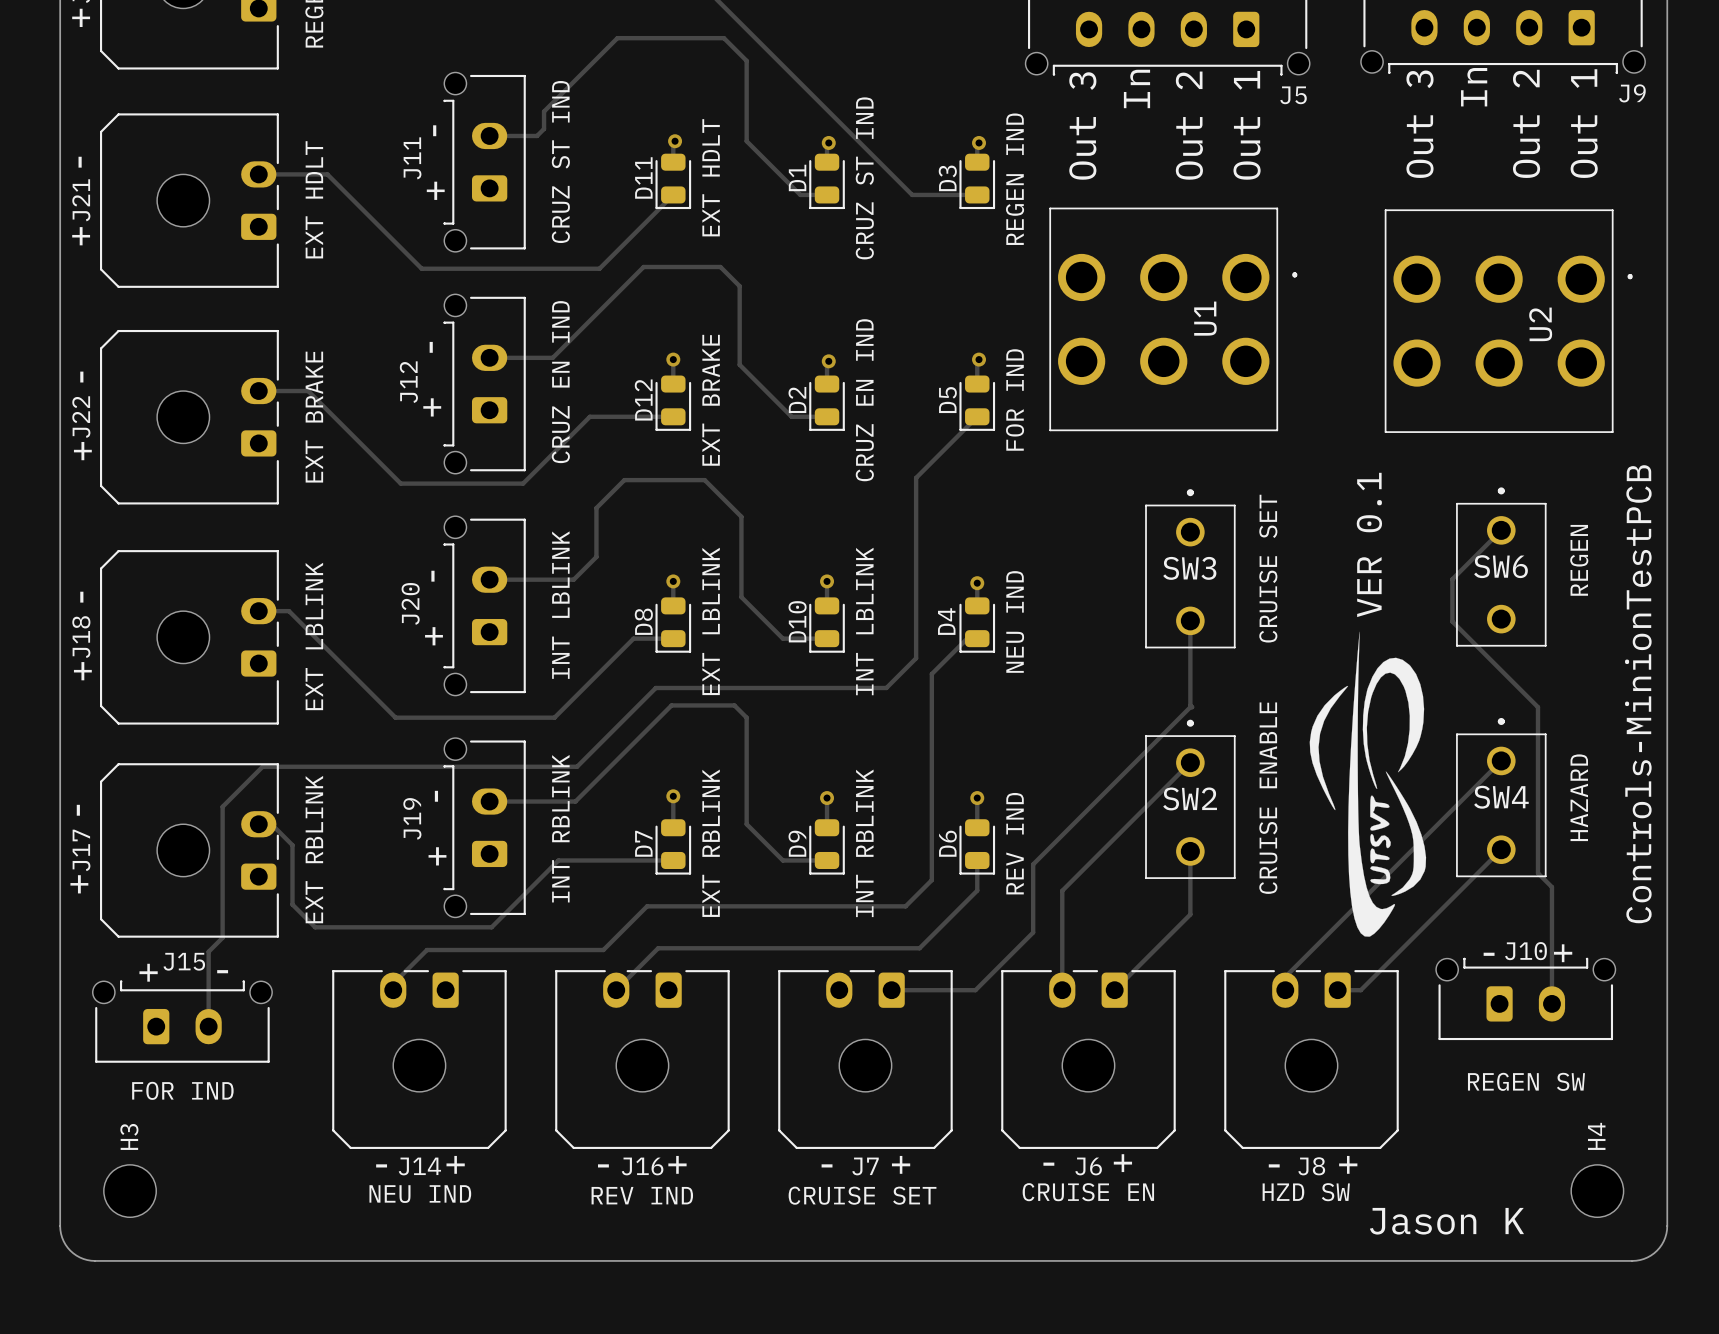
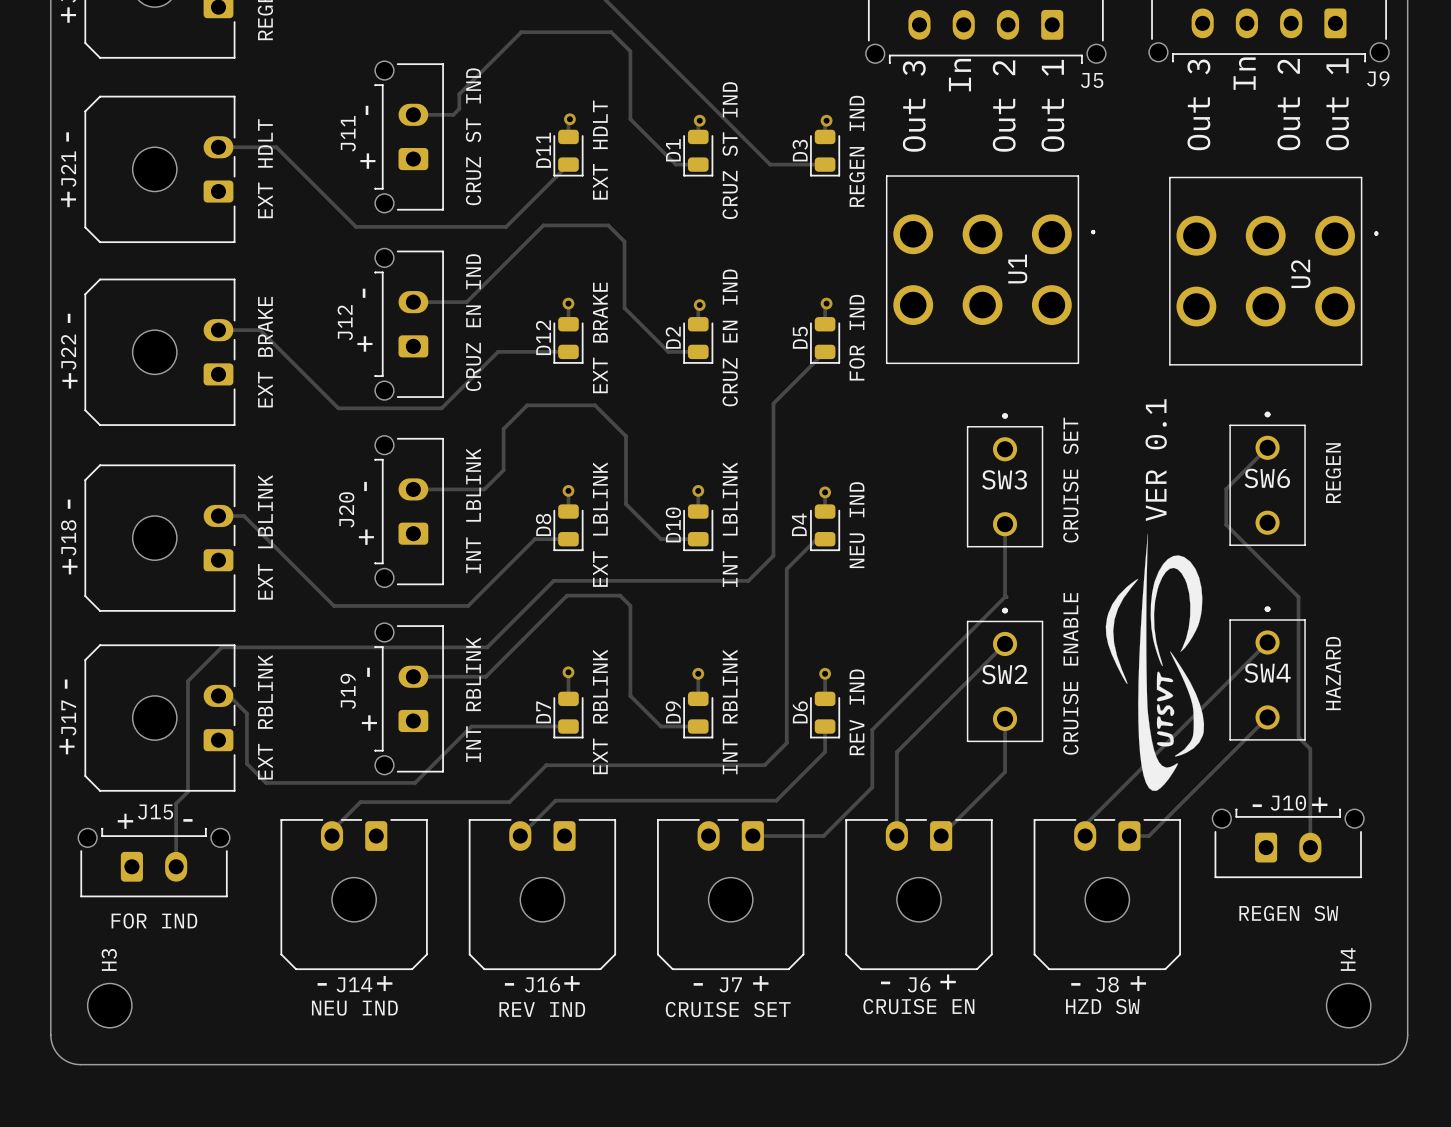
text: Controls-MinionTestPCB (1638, 694) -> none
text: Jason K (1446, 1221) -> none

